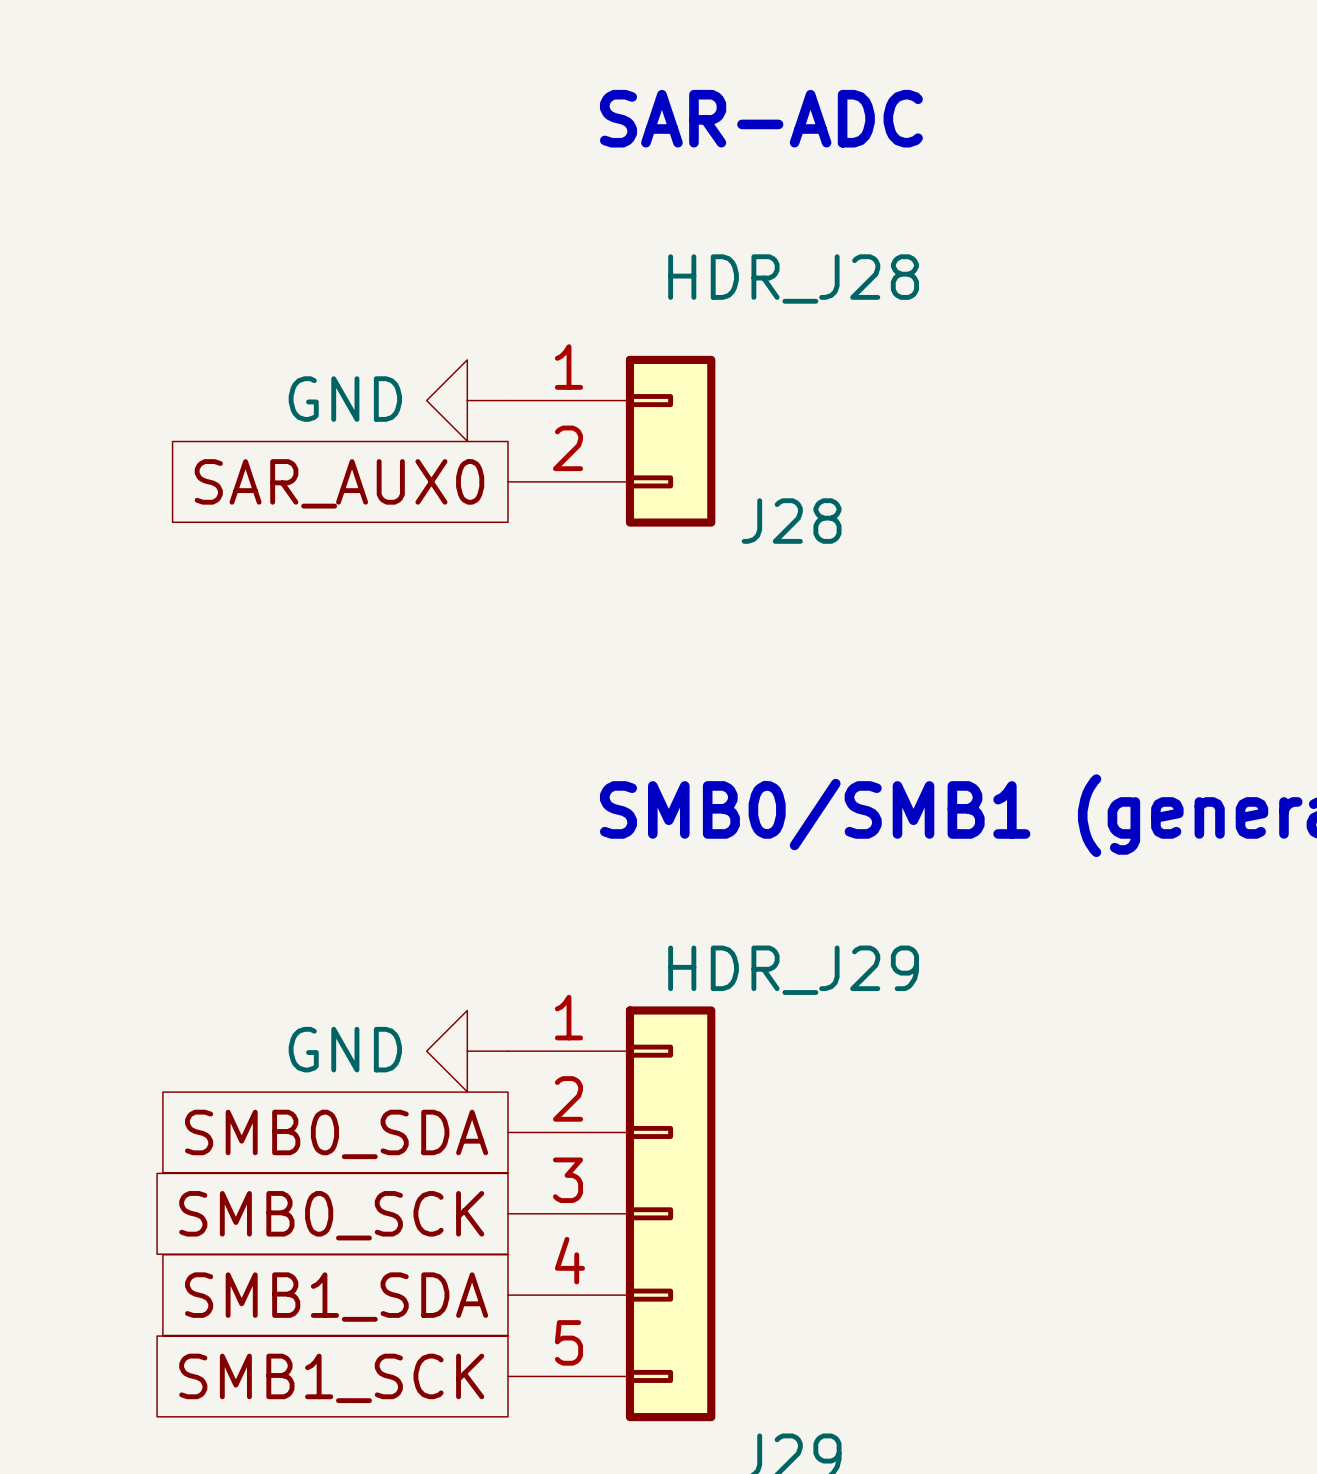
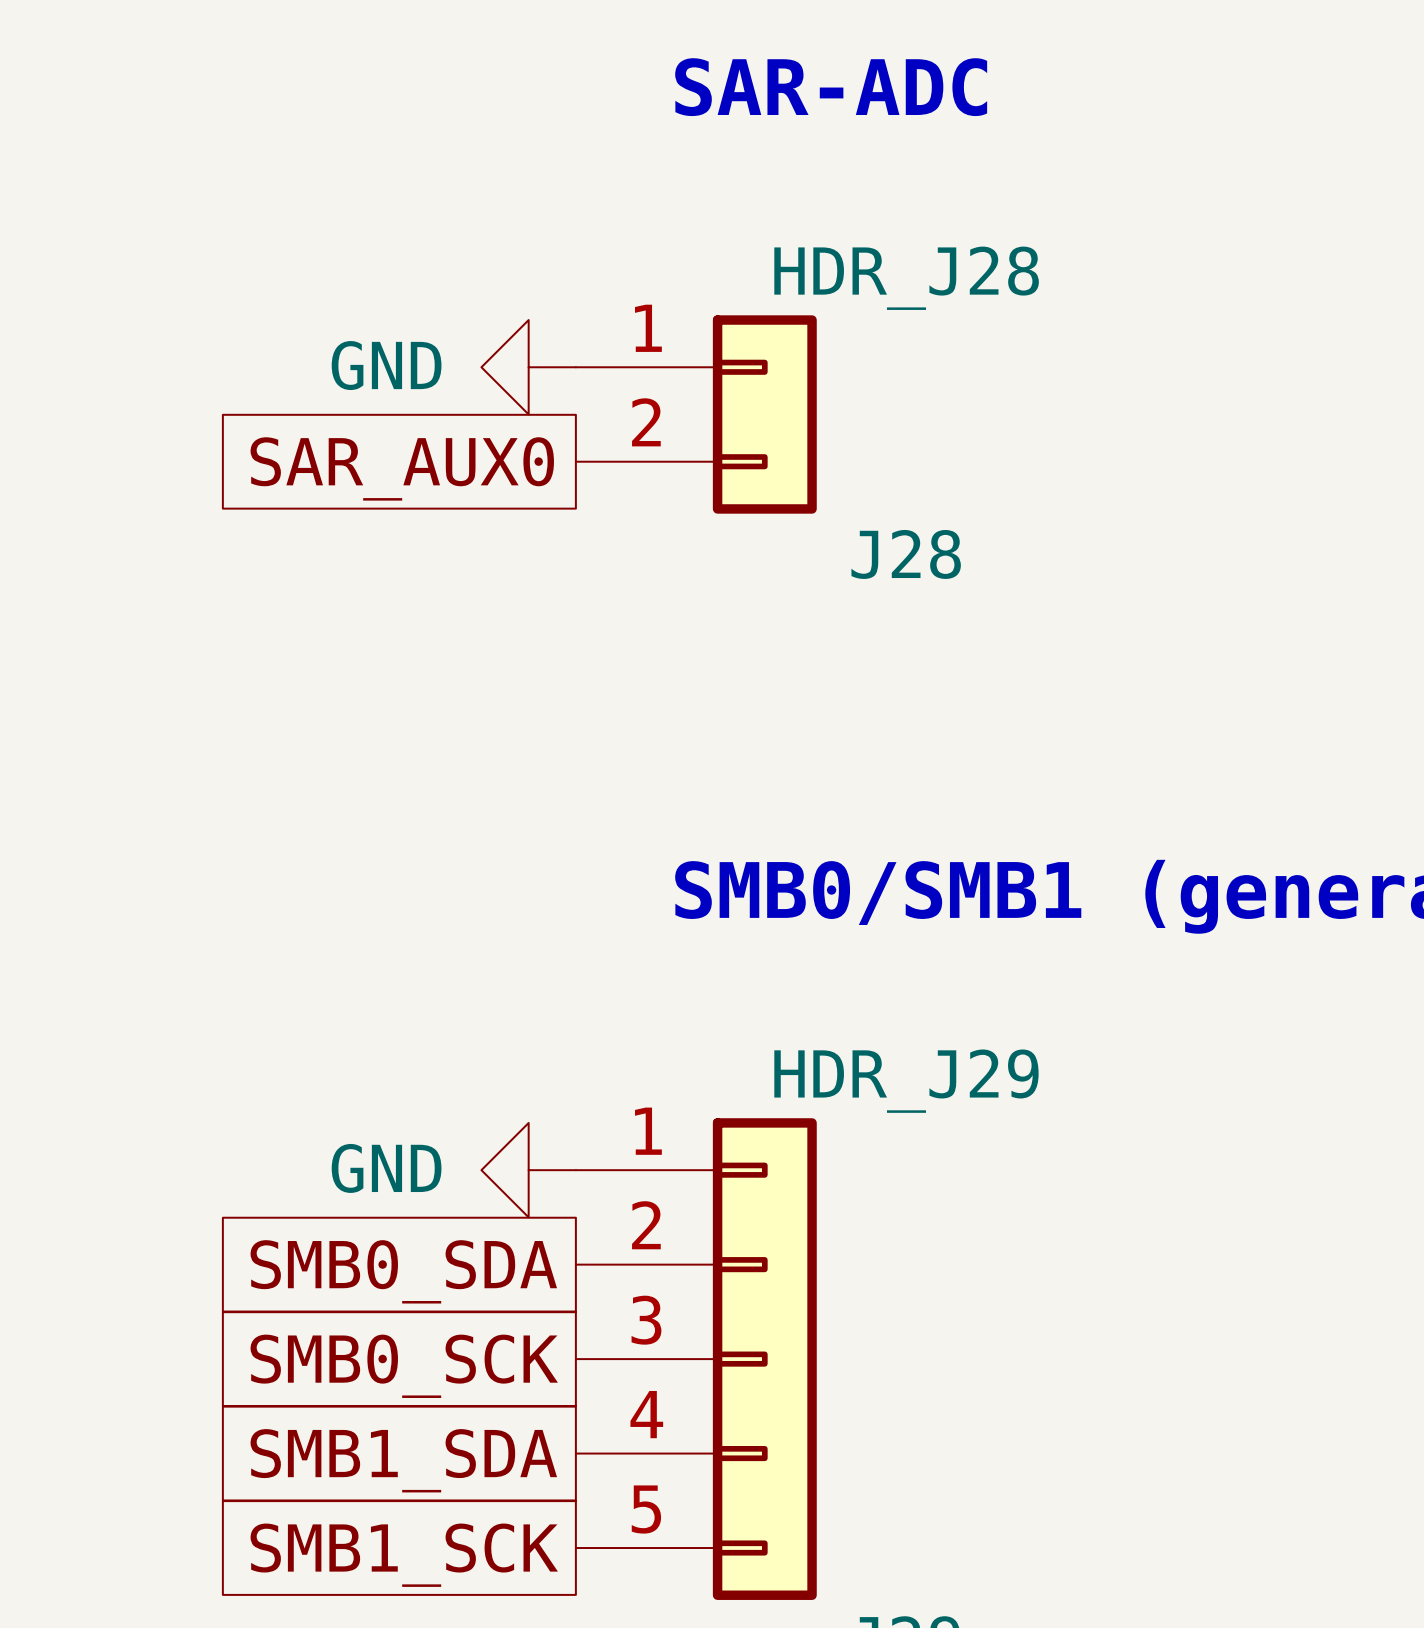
power symbol position: GND (467, 400) -> GND (528, 367)
J28 position: (611, 441) -> (696, 414)
global label position: SAR_AUX0 (339, 483) -> SAR_AUX0 (402, 468)

